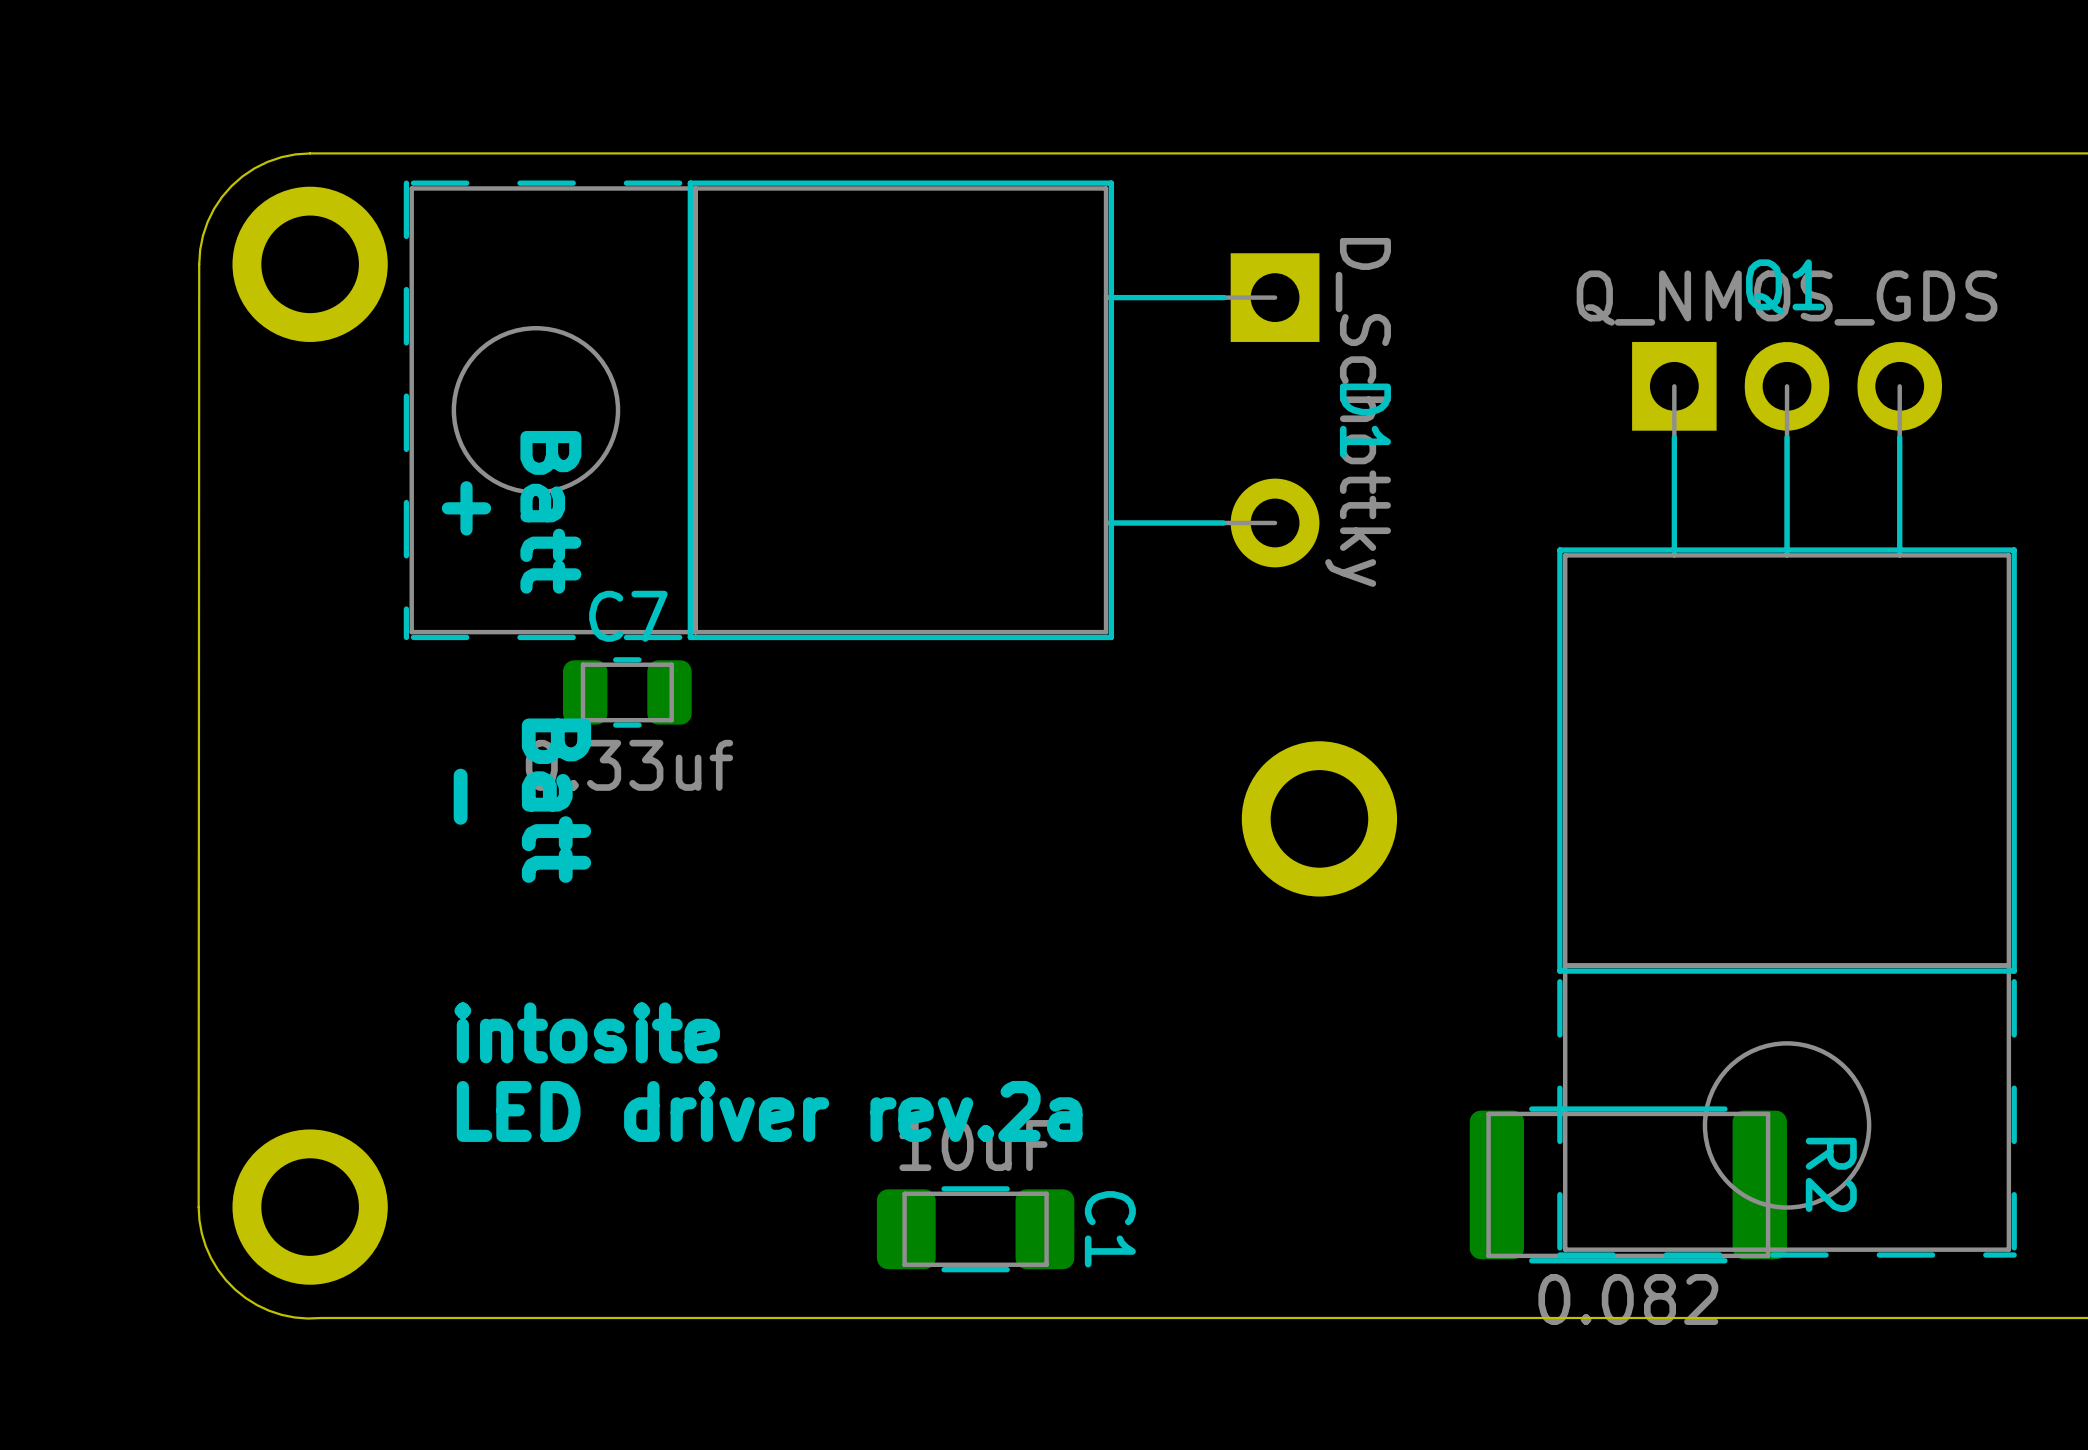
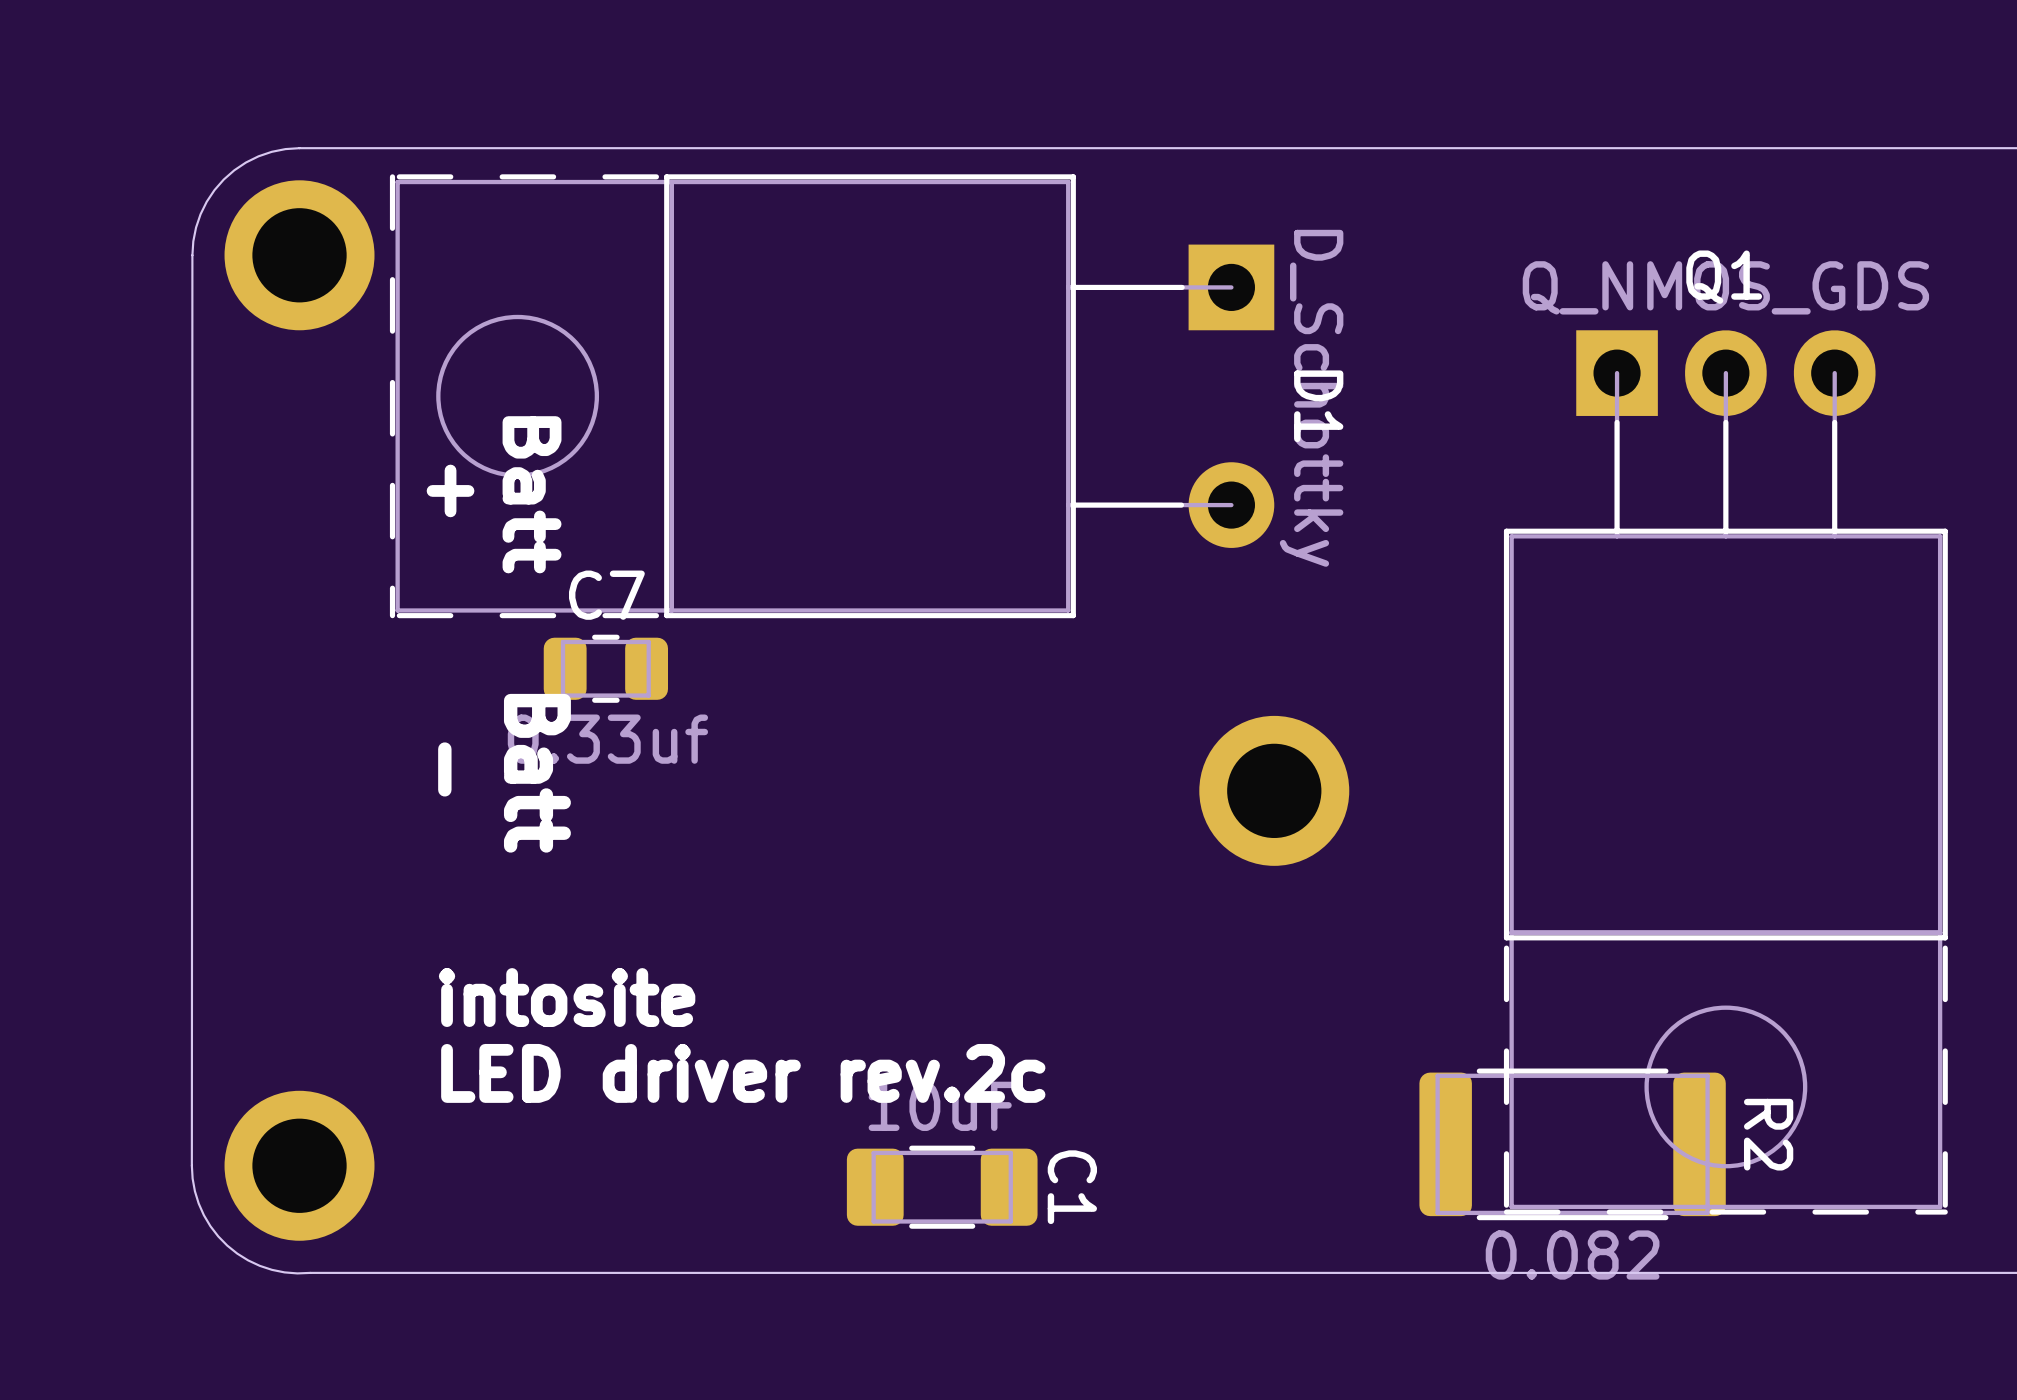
text: LED driver rev.2a (769, 1111) -> LED driver rev.2c (743, 1073)

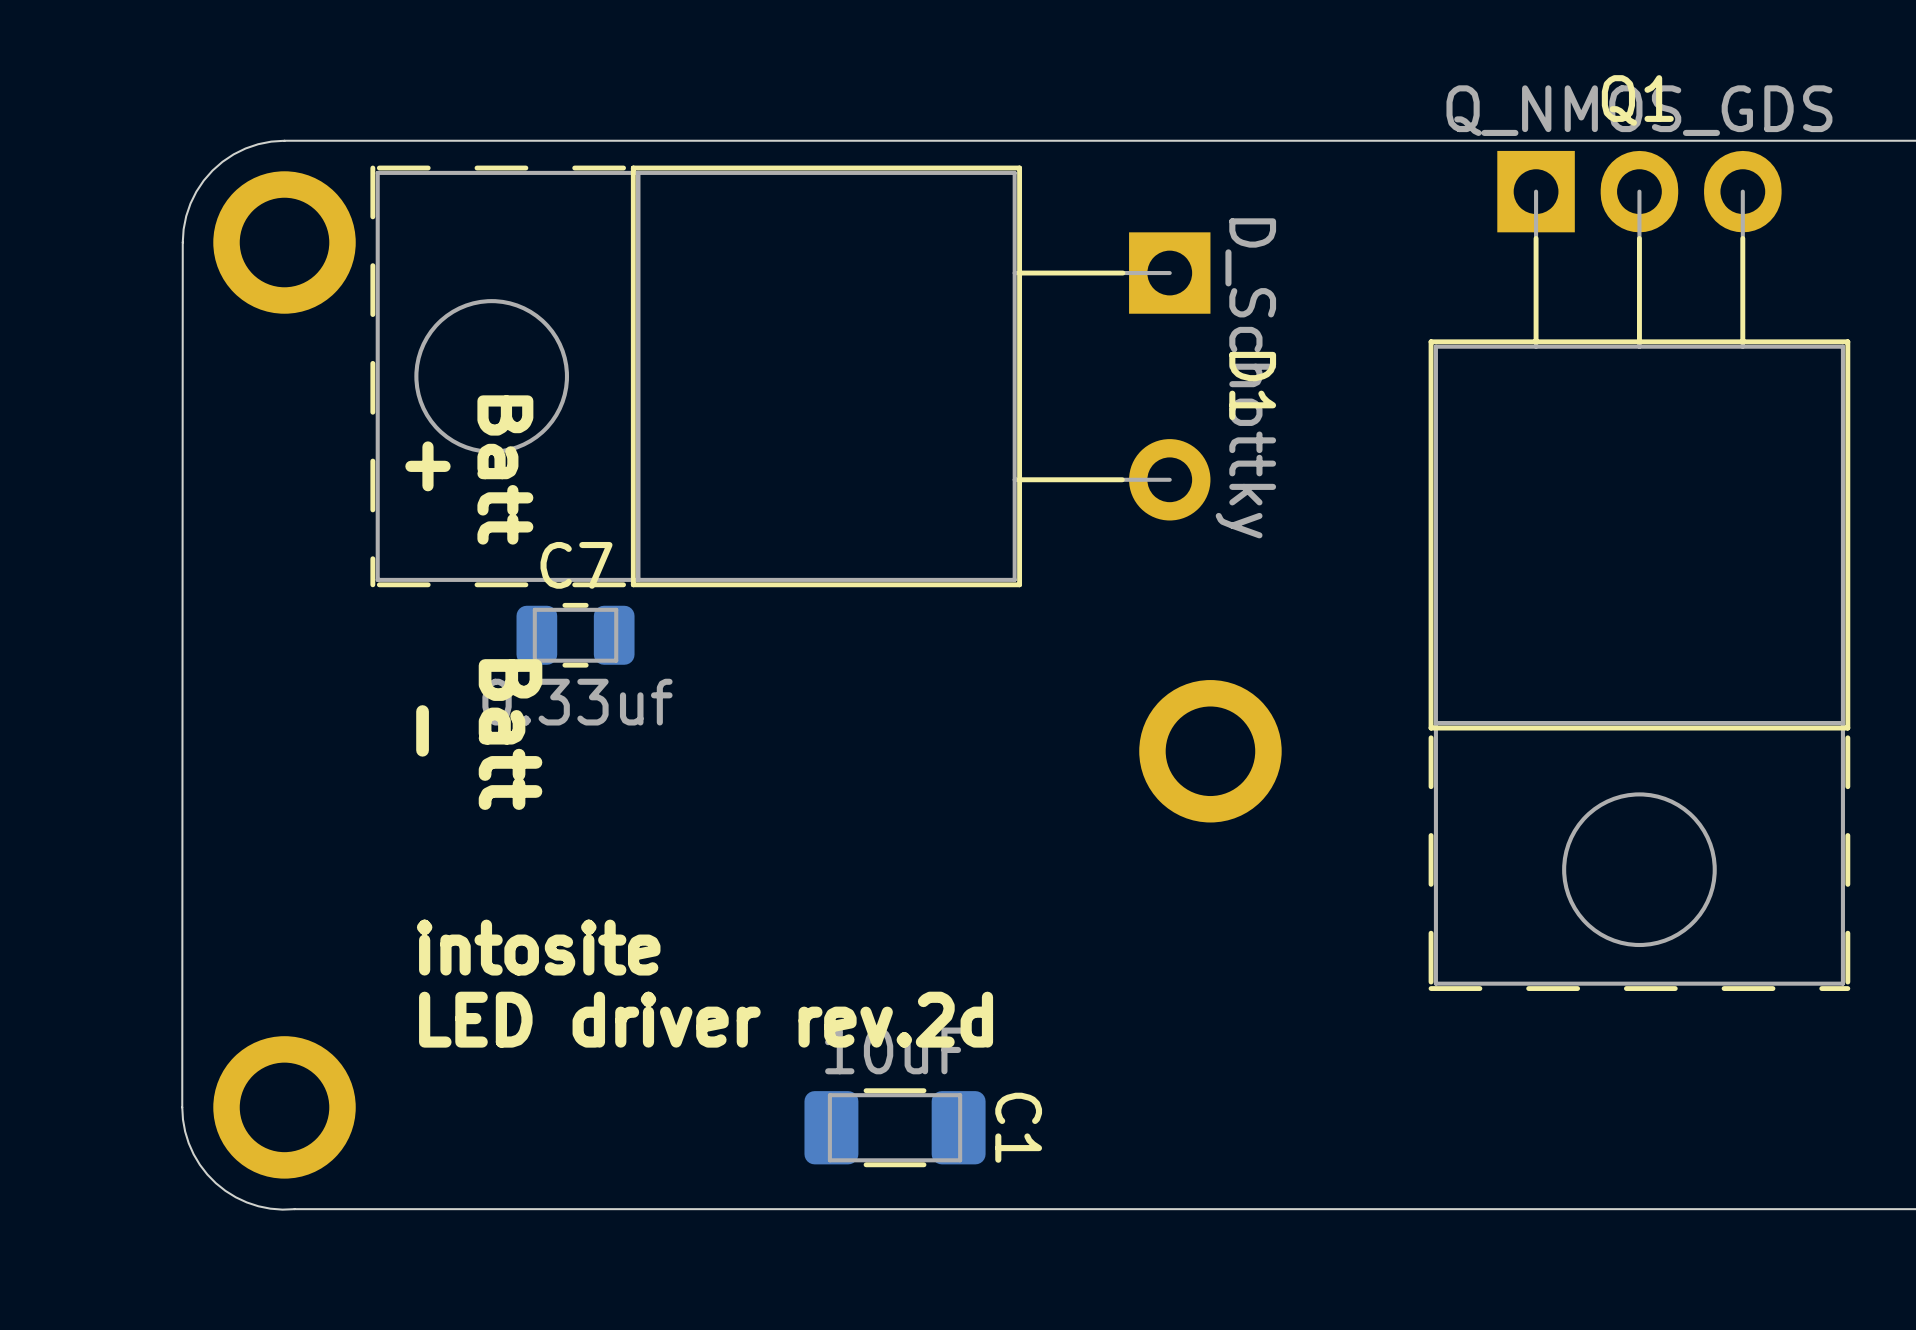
Q1 position: (1725, 772) -> (1639, 570)
text: LED driver rev.2c (743, 1073) -> LED driver rev.2d (706, 1019)
R2: 0.082 (1572, 1144) -> none

